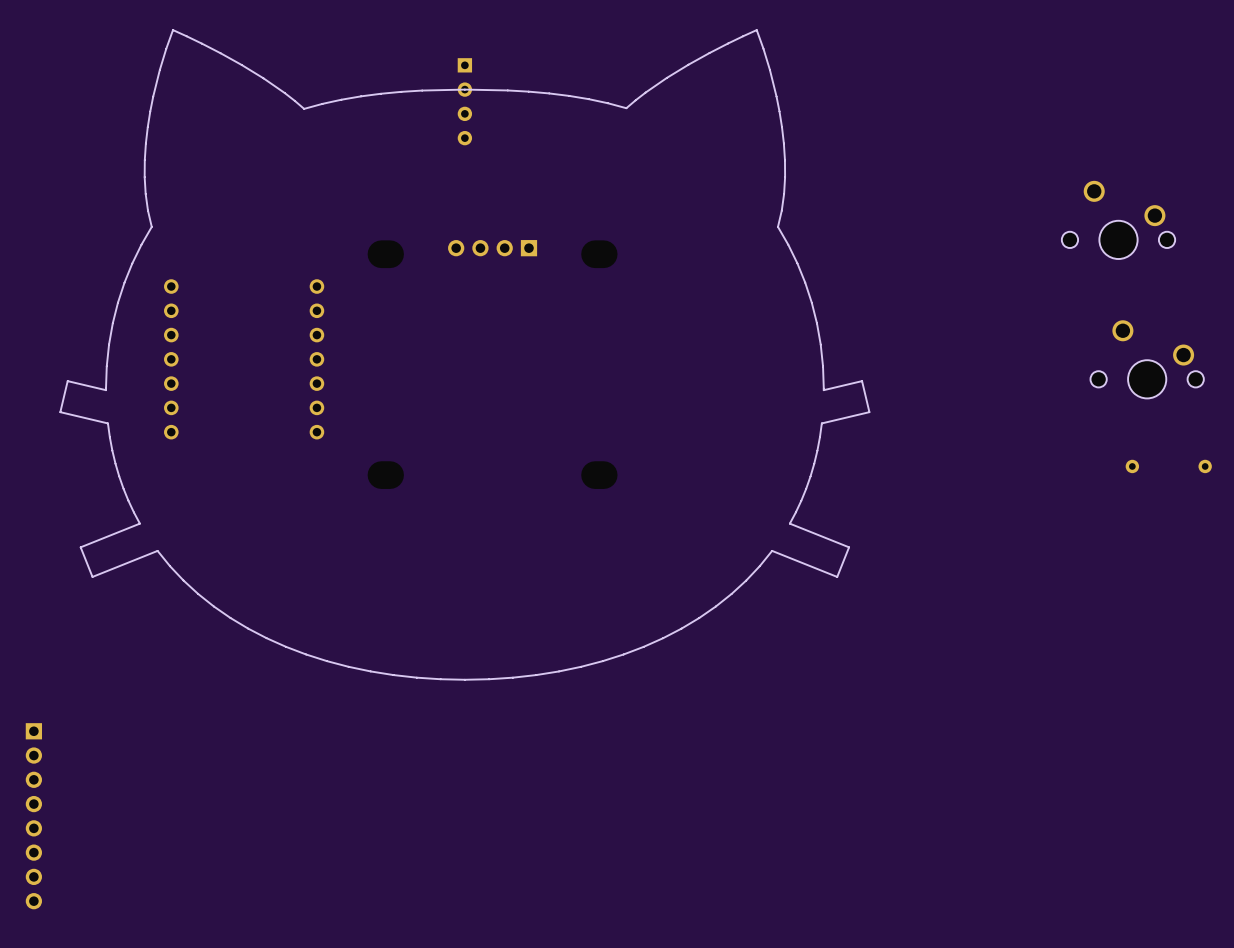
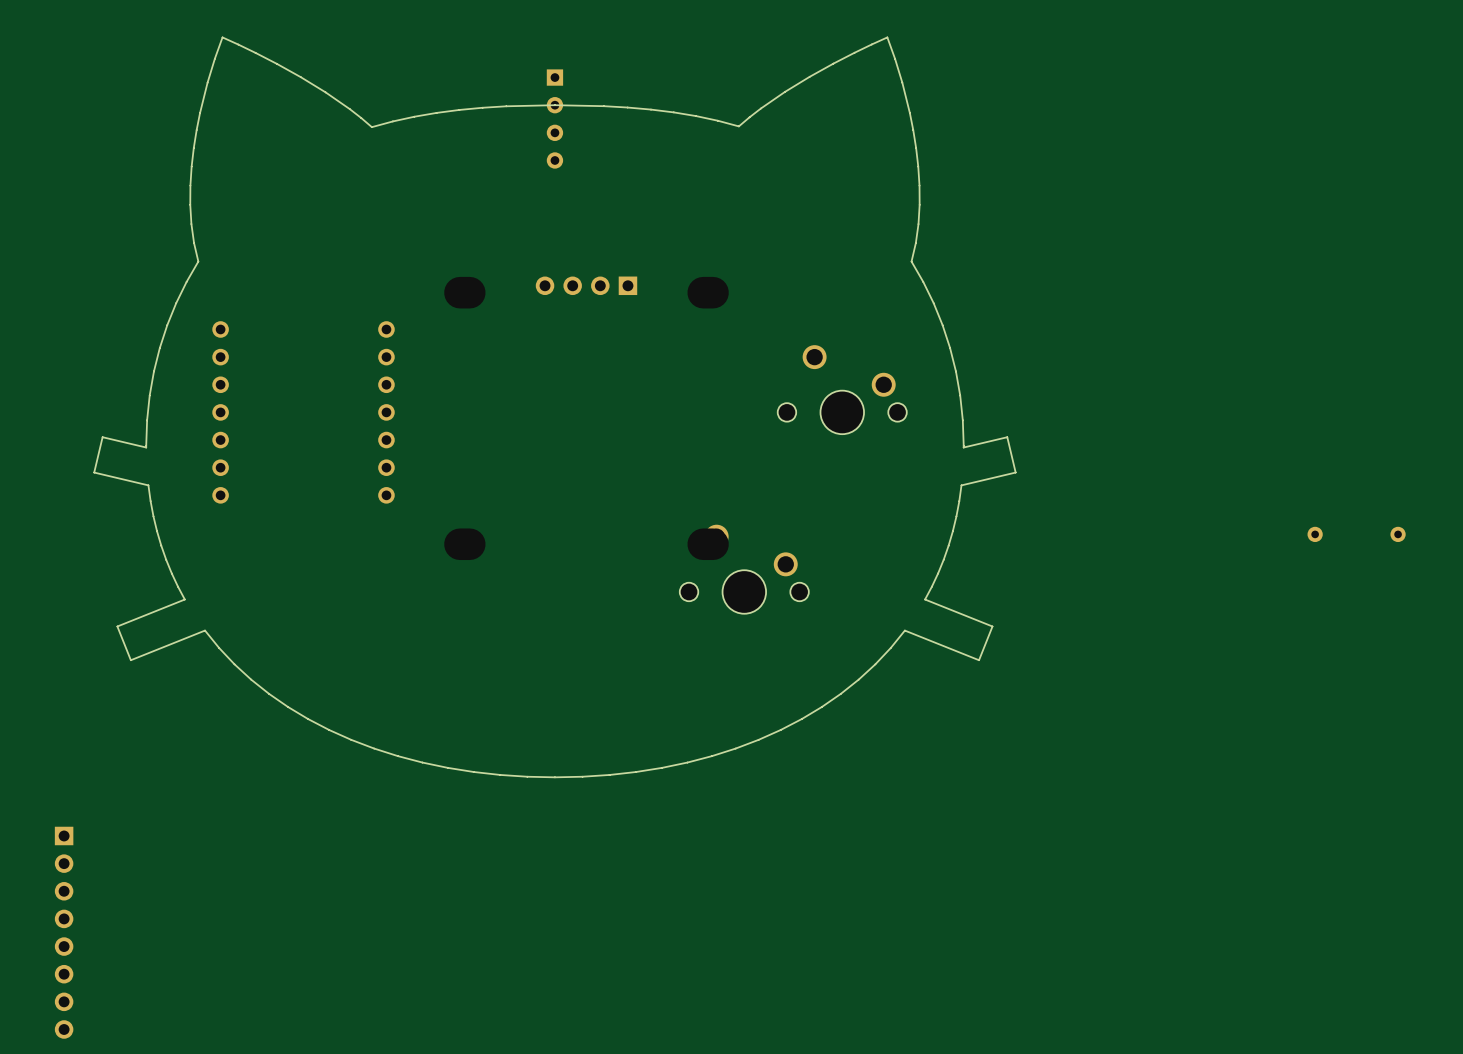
part: (1118, 219) -> none
part: none -> (842, 389)
part: (1147, 359) -> none
part: none -> (744, 569)

